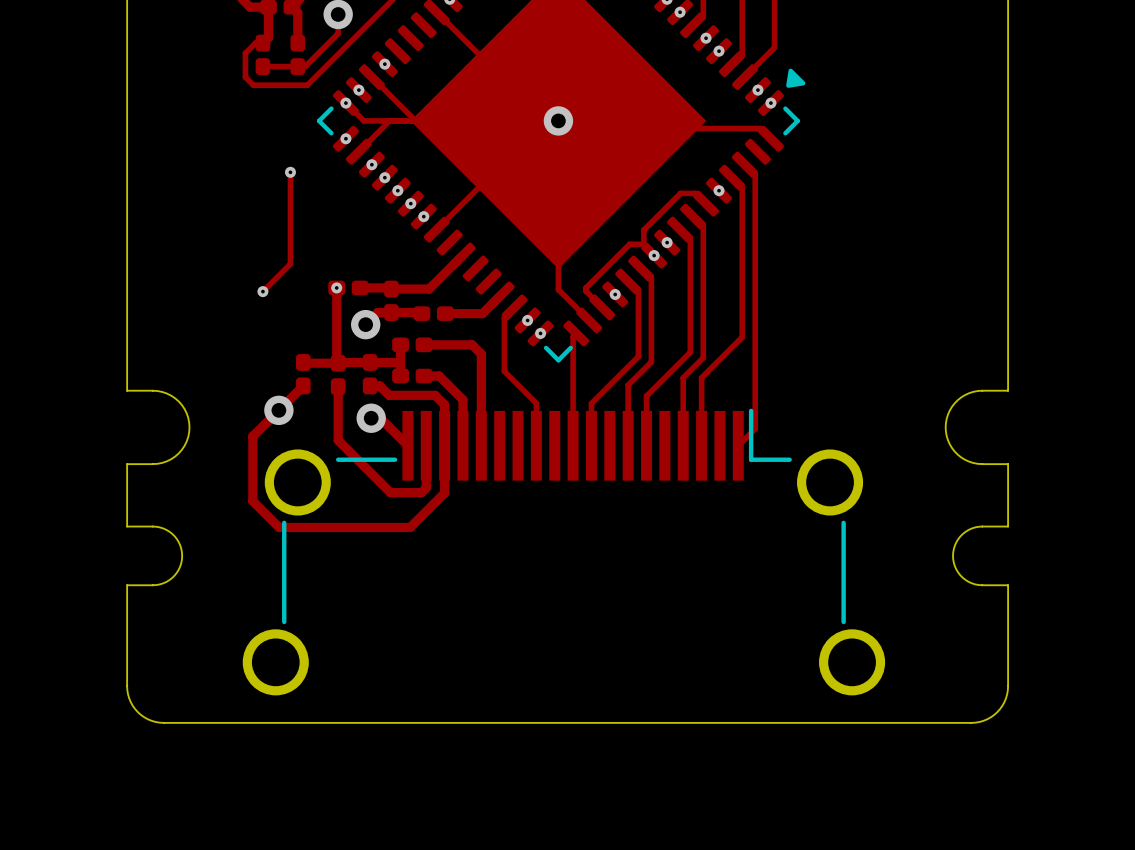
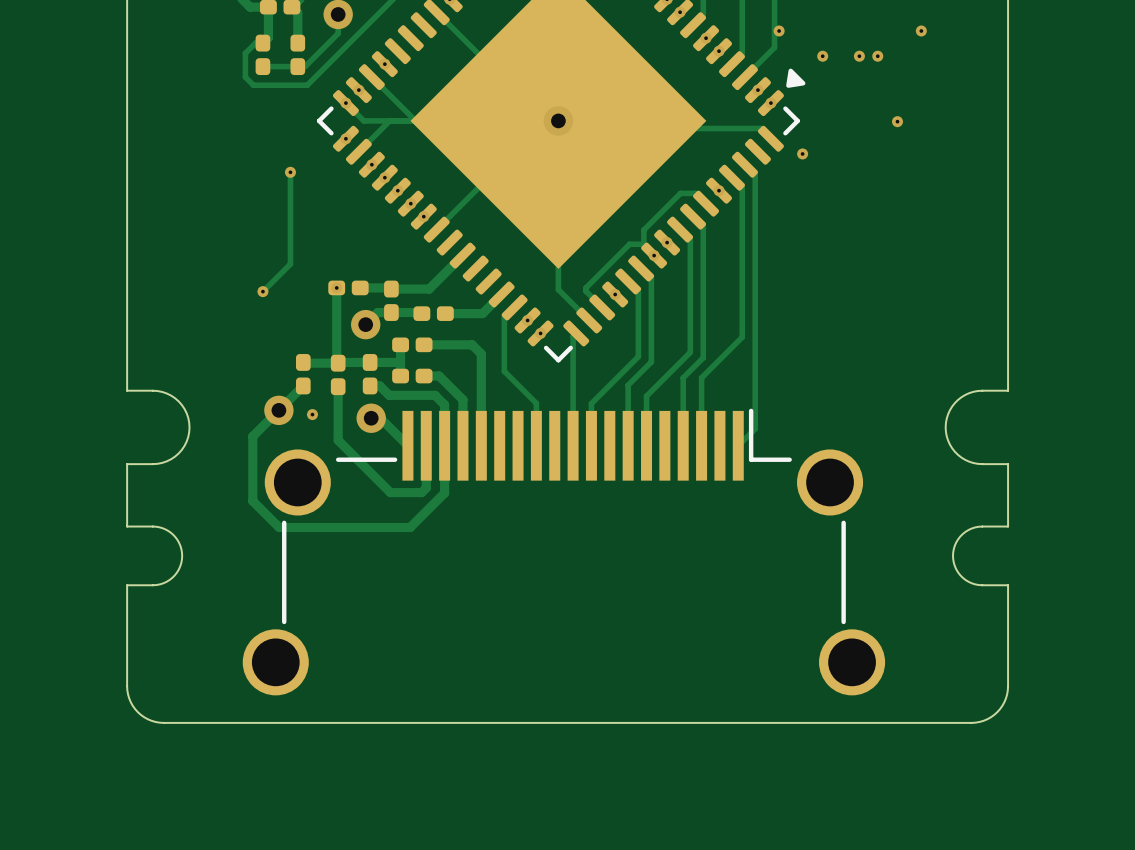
via: none -> (779, 30)
via: none -> (921, 30)
via: none -> (822, 56)
via: none -> (859, 56)
via: none -> (877, 56)
via: none -> (897, 121)
via: none -> (802, 153)
via: none -> (312, 414)

